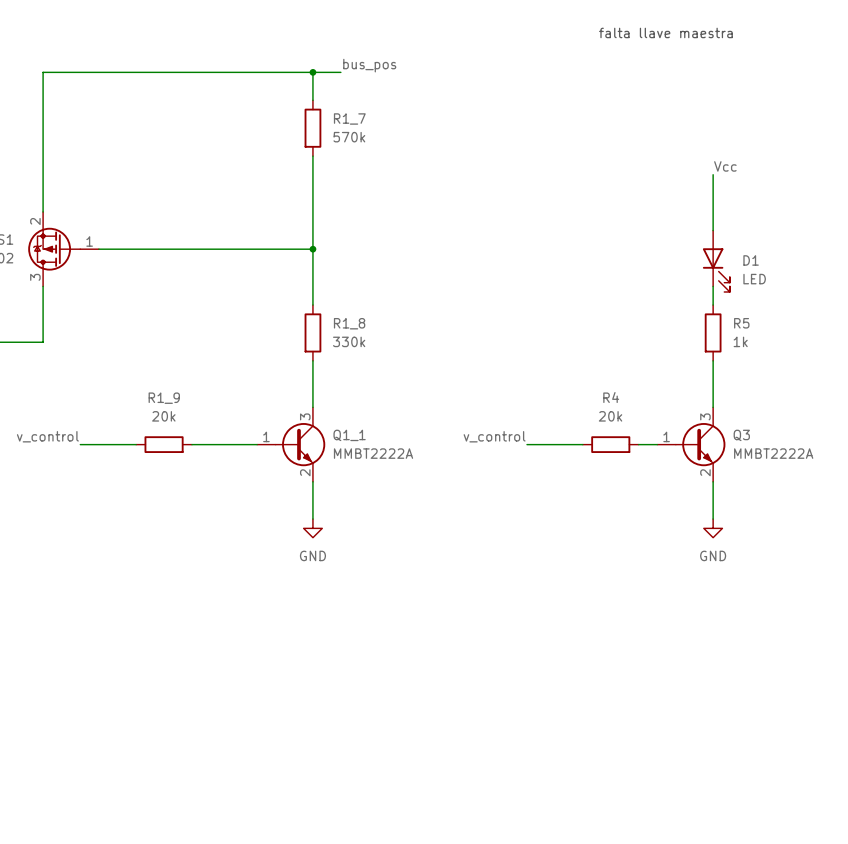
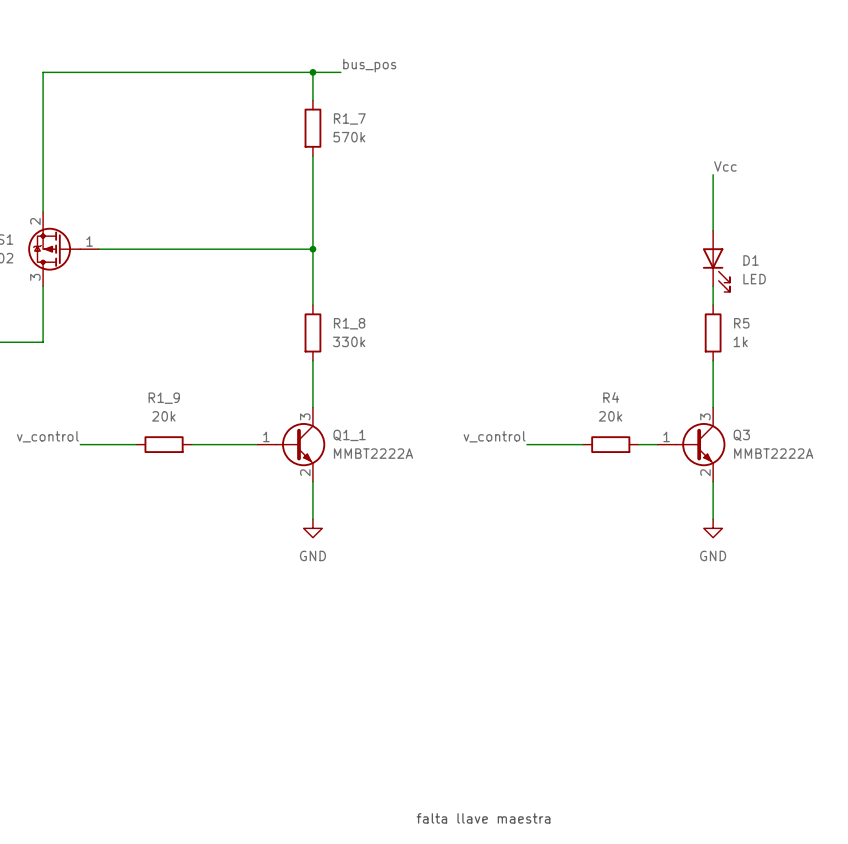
text: falta llave maestra (665, 32) -> none
text: none -> falta llave maestra (483, 818)

